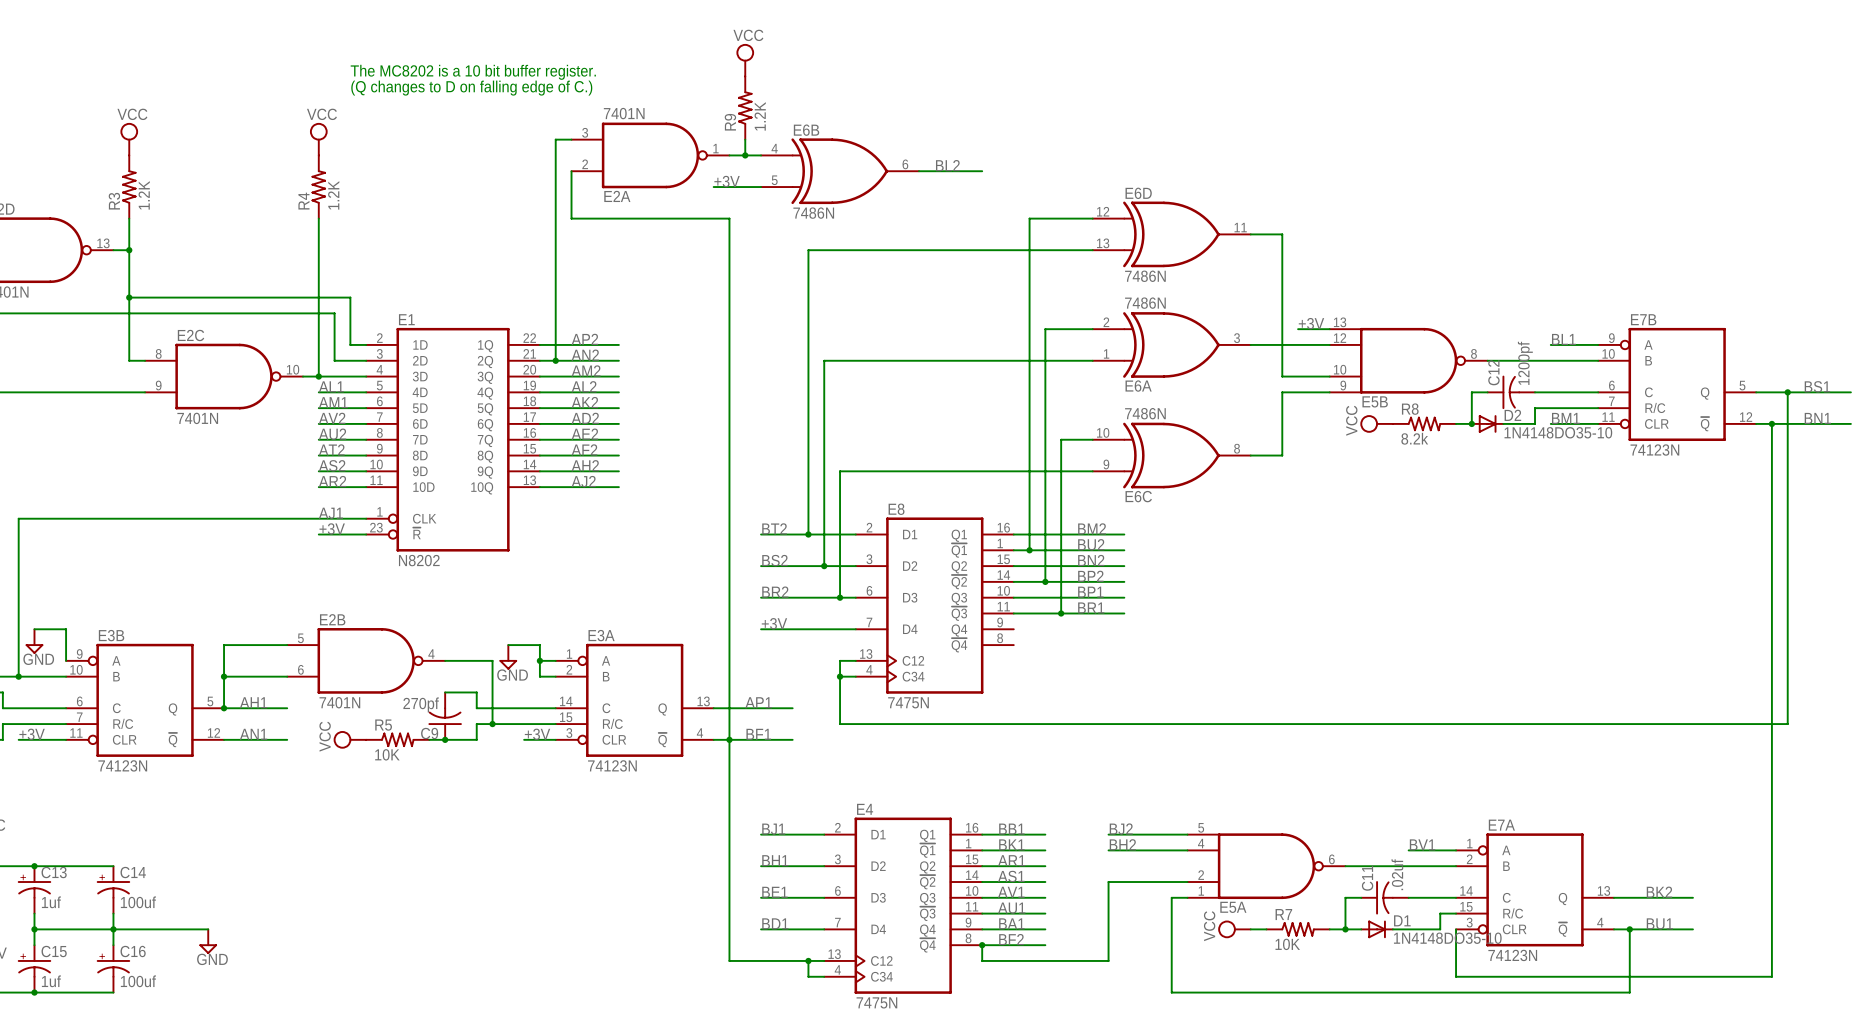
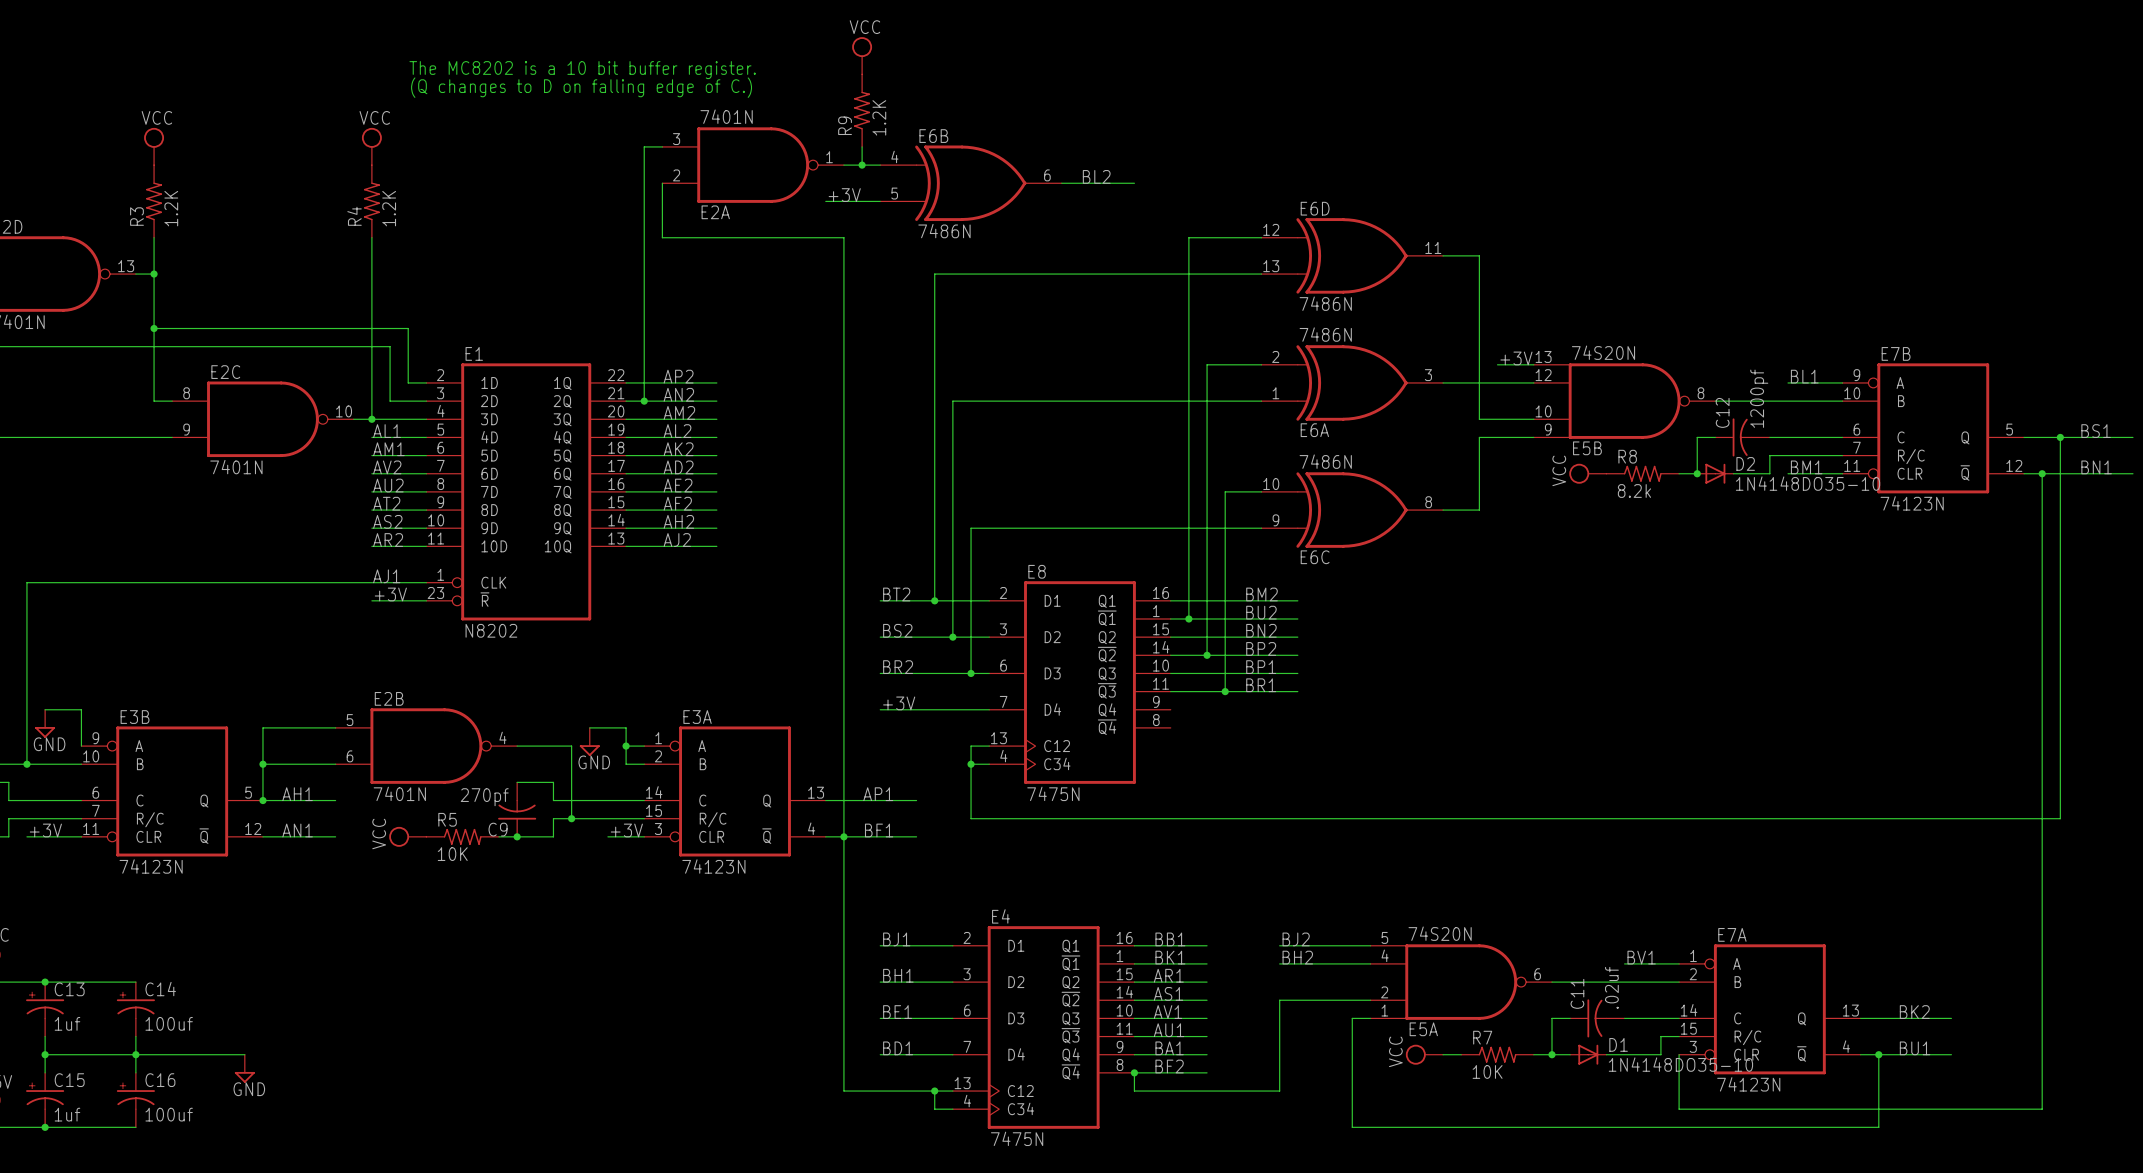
E5B value: none -> 74S20N (1603, 352)
E5A value: none -> 74S20N (1440, 933)

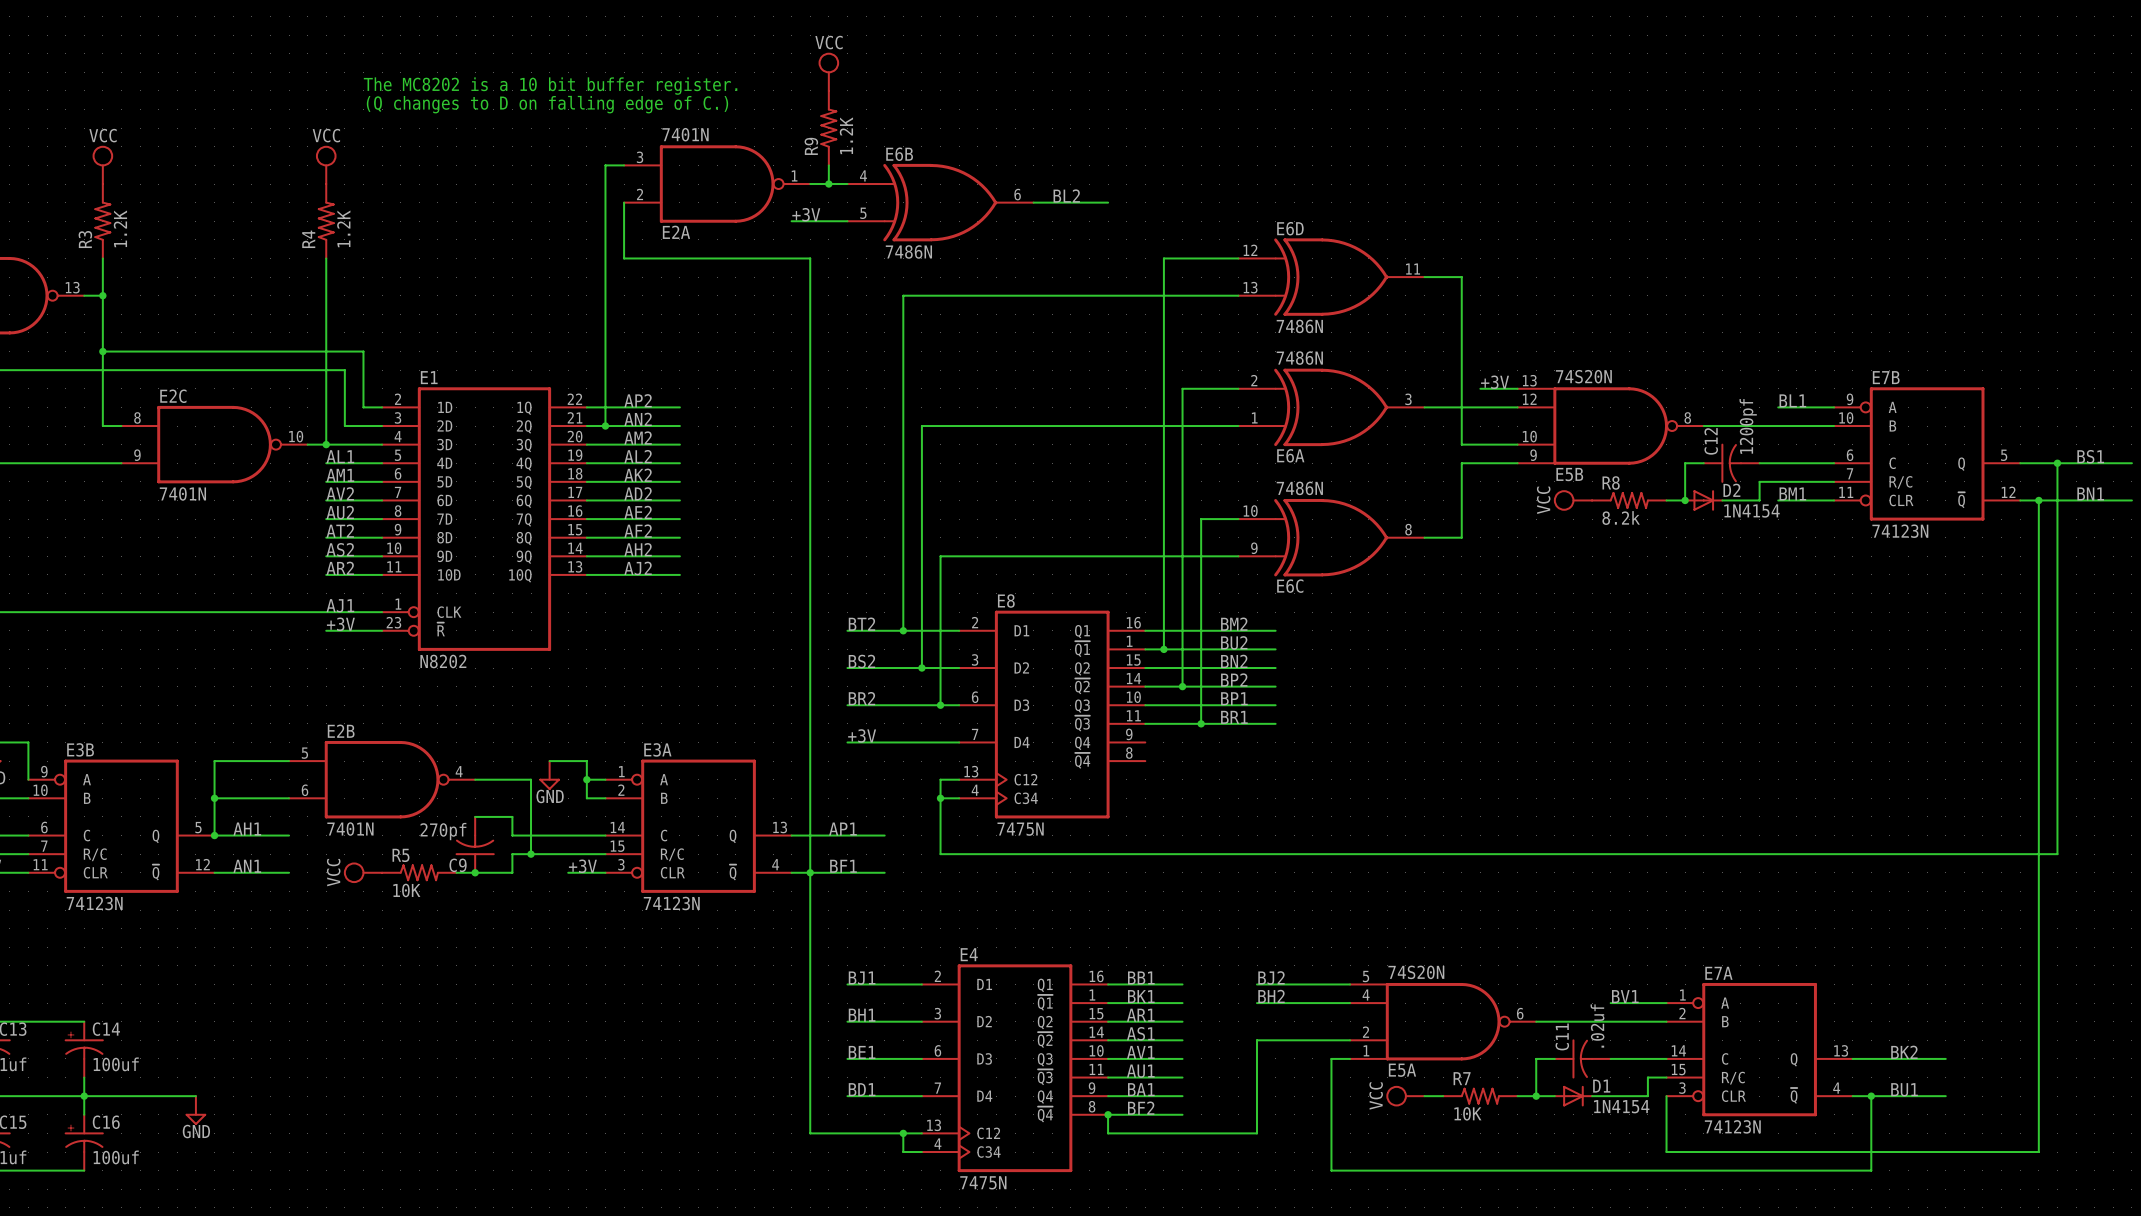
D2 value: 1N4148DO35-10 (1808, 483) -> 1N4154 (1752, 511)
D1 value: 1N4148DO35-10 (1680, 1064) -> 1N4154 (1621, 1106)

